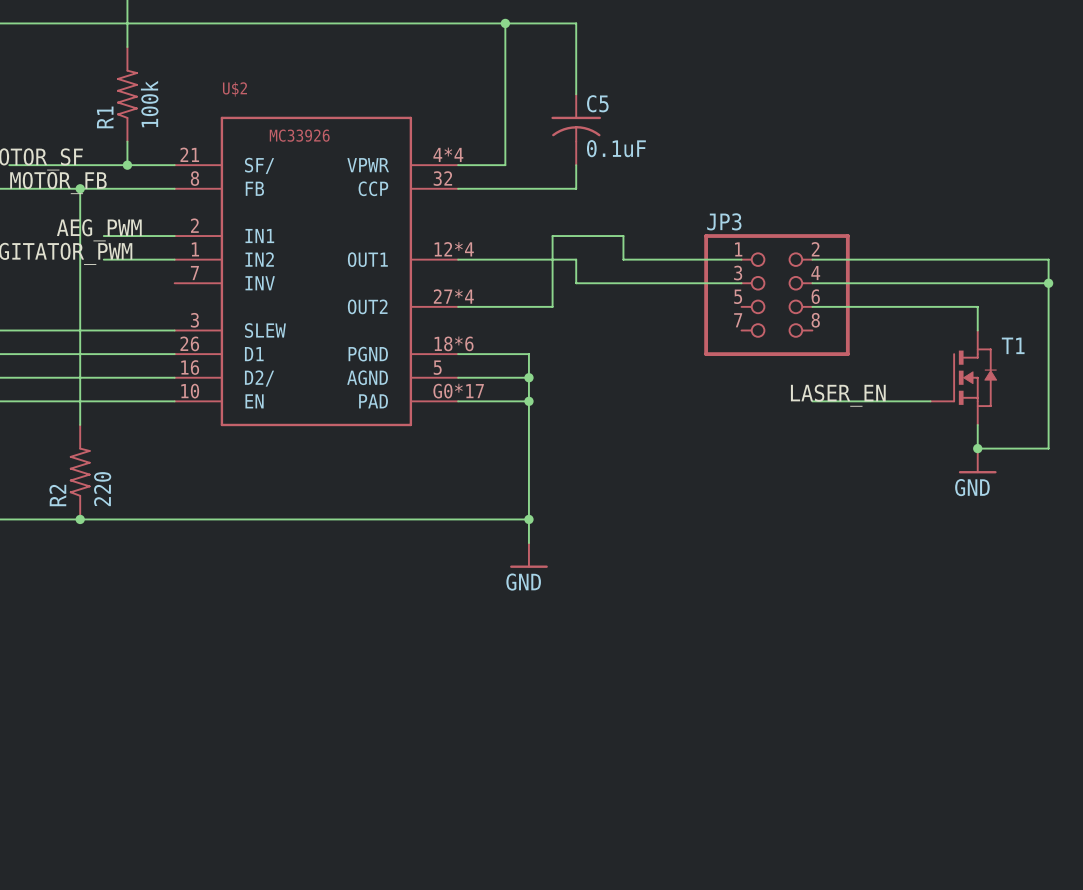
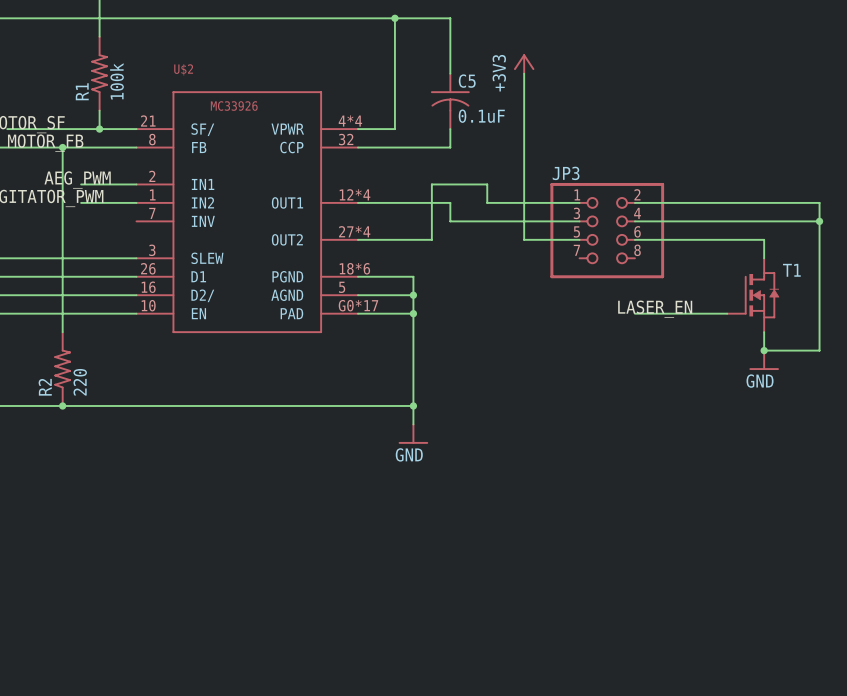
power symbol: none -> +3V3 (524, 64)
wire: none -> (524, 73) (524, 239) (579, 239)

